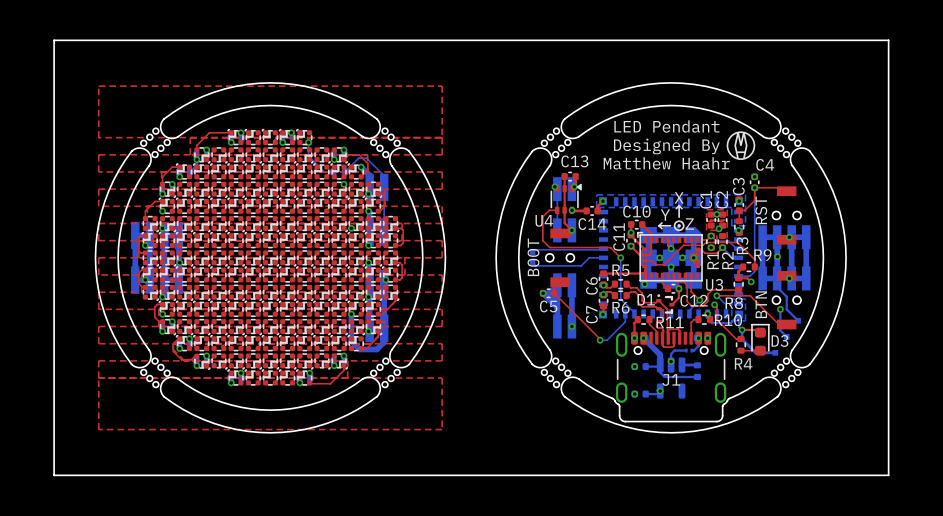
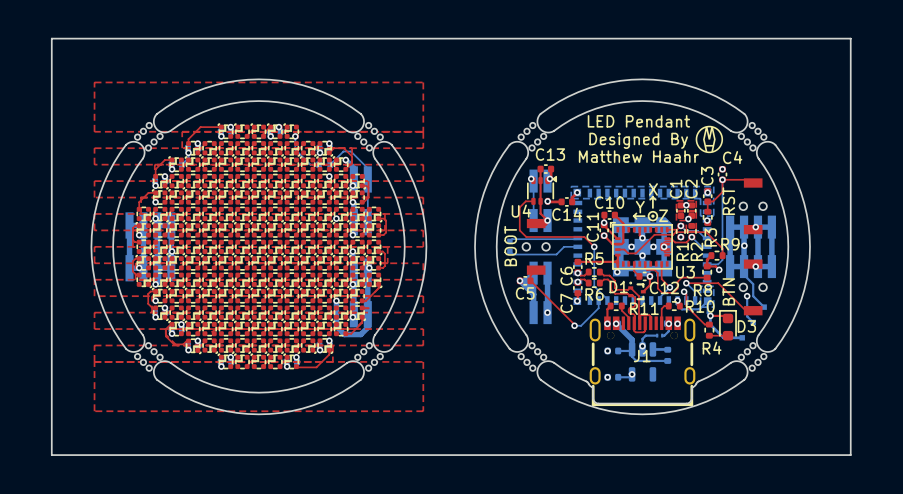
U3 footprint: [637, 205, 703, 282] -> [610, 196, 673, 270]
J1 footprint: [615, 331, 727, 403] -> [589, 316, 696, 407]

